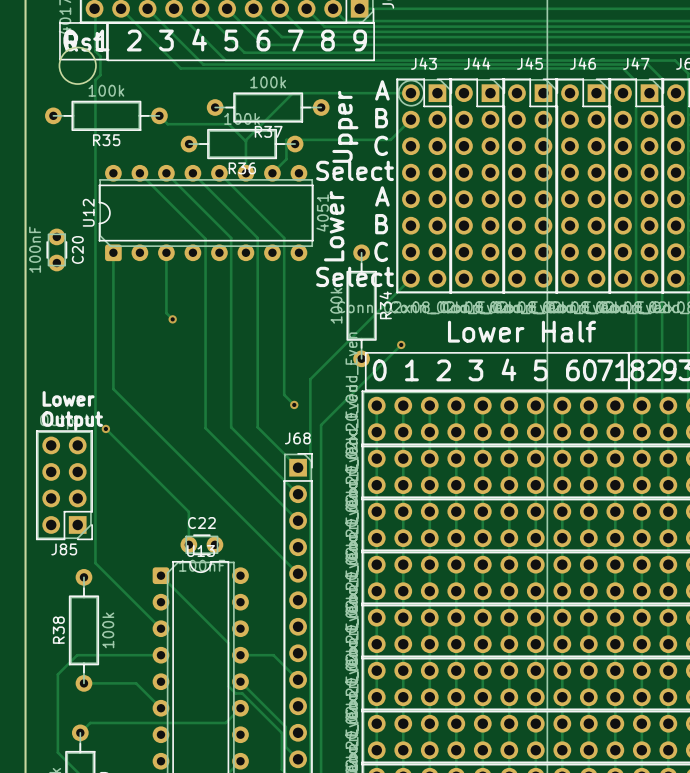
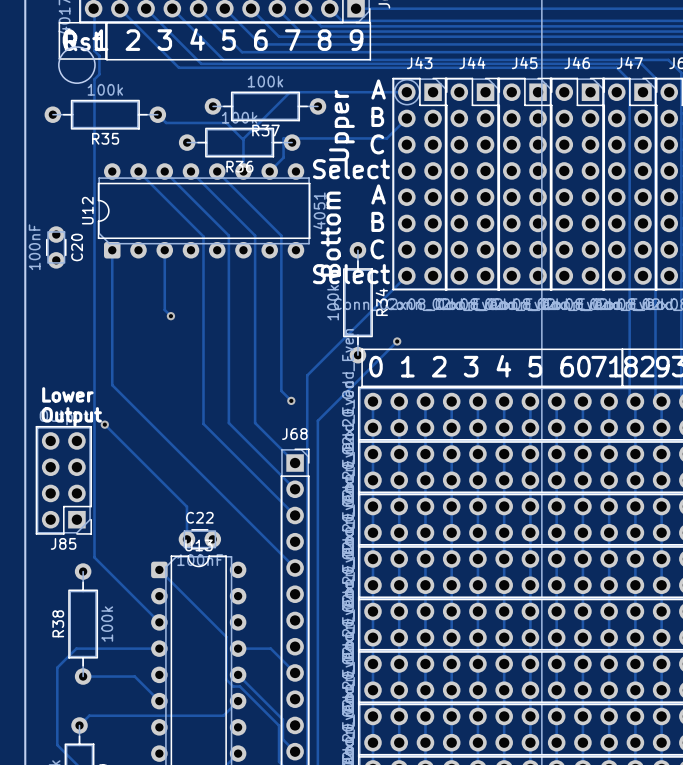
text: Lower (334, 226) -> Bottom (330, 234)
text: Lower Half (521, 331) -> none

